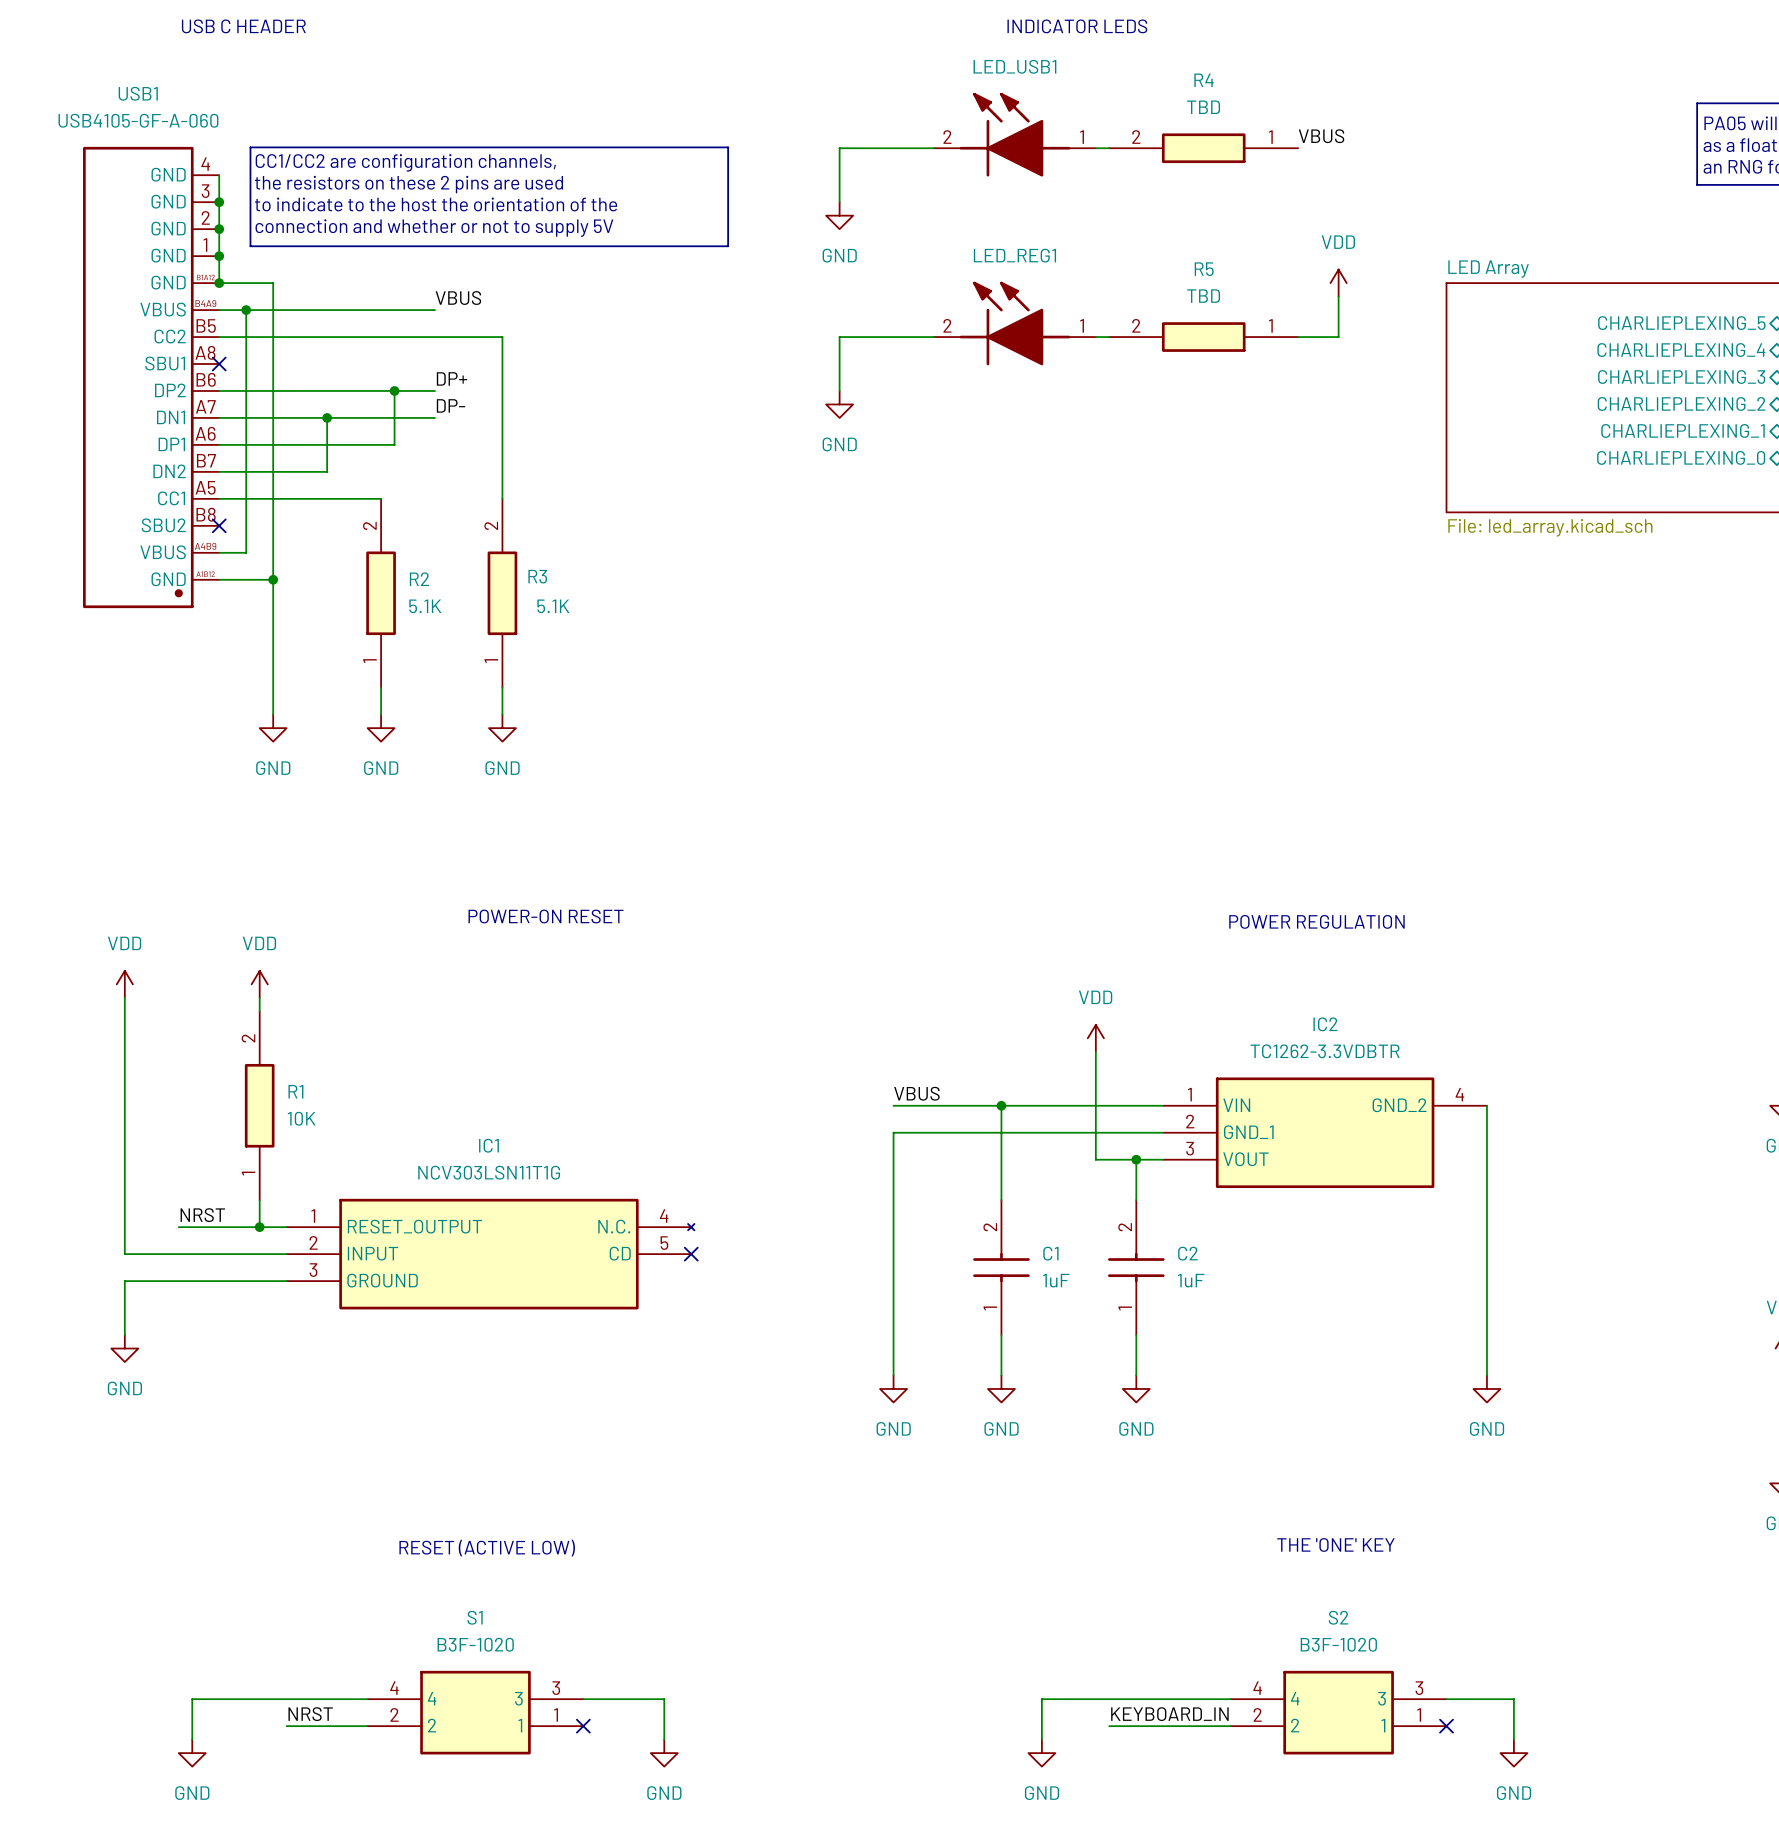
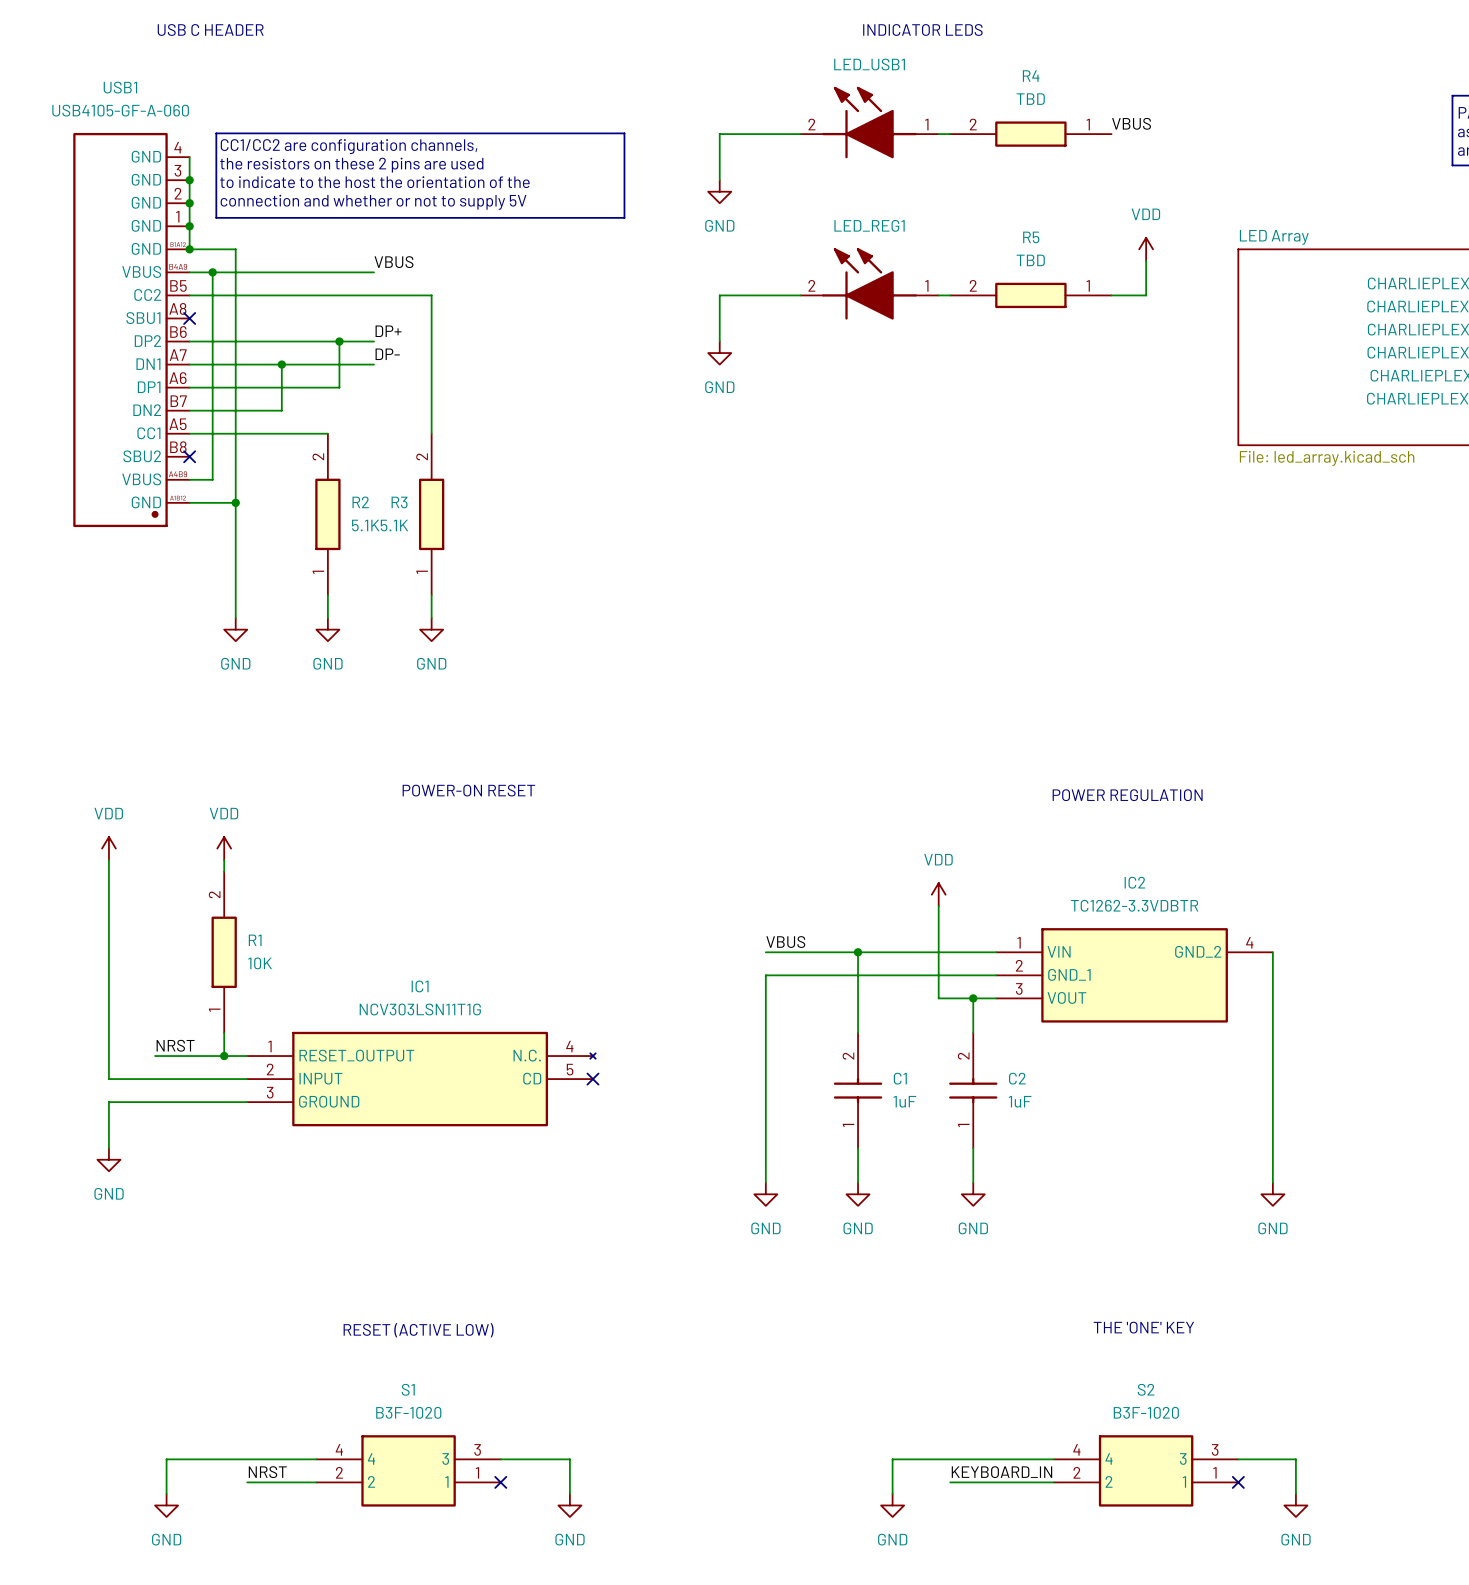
R3 name position: R3 (537, 576) -> R3 (399, 502)
R3 value position: 5.1K (553, 606) -> 5.1K (394, 525)

